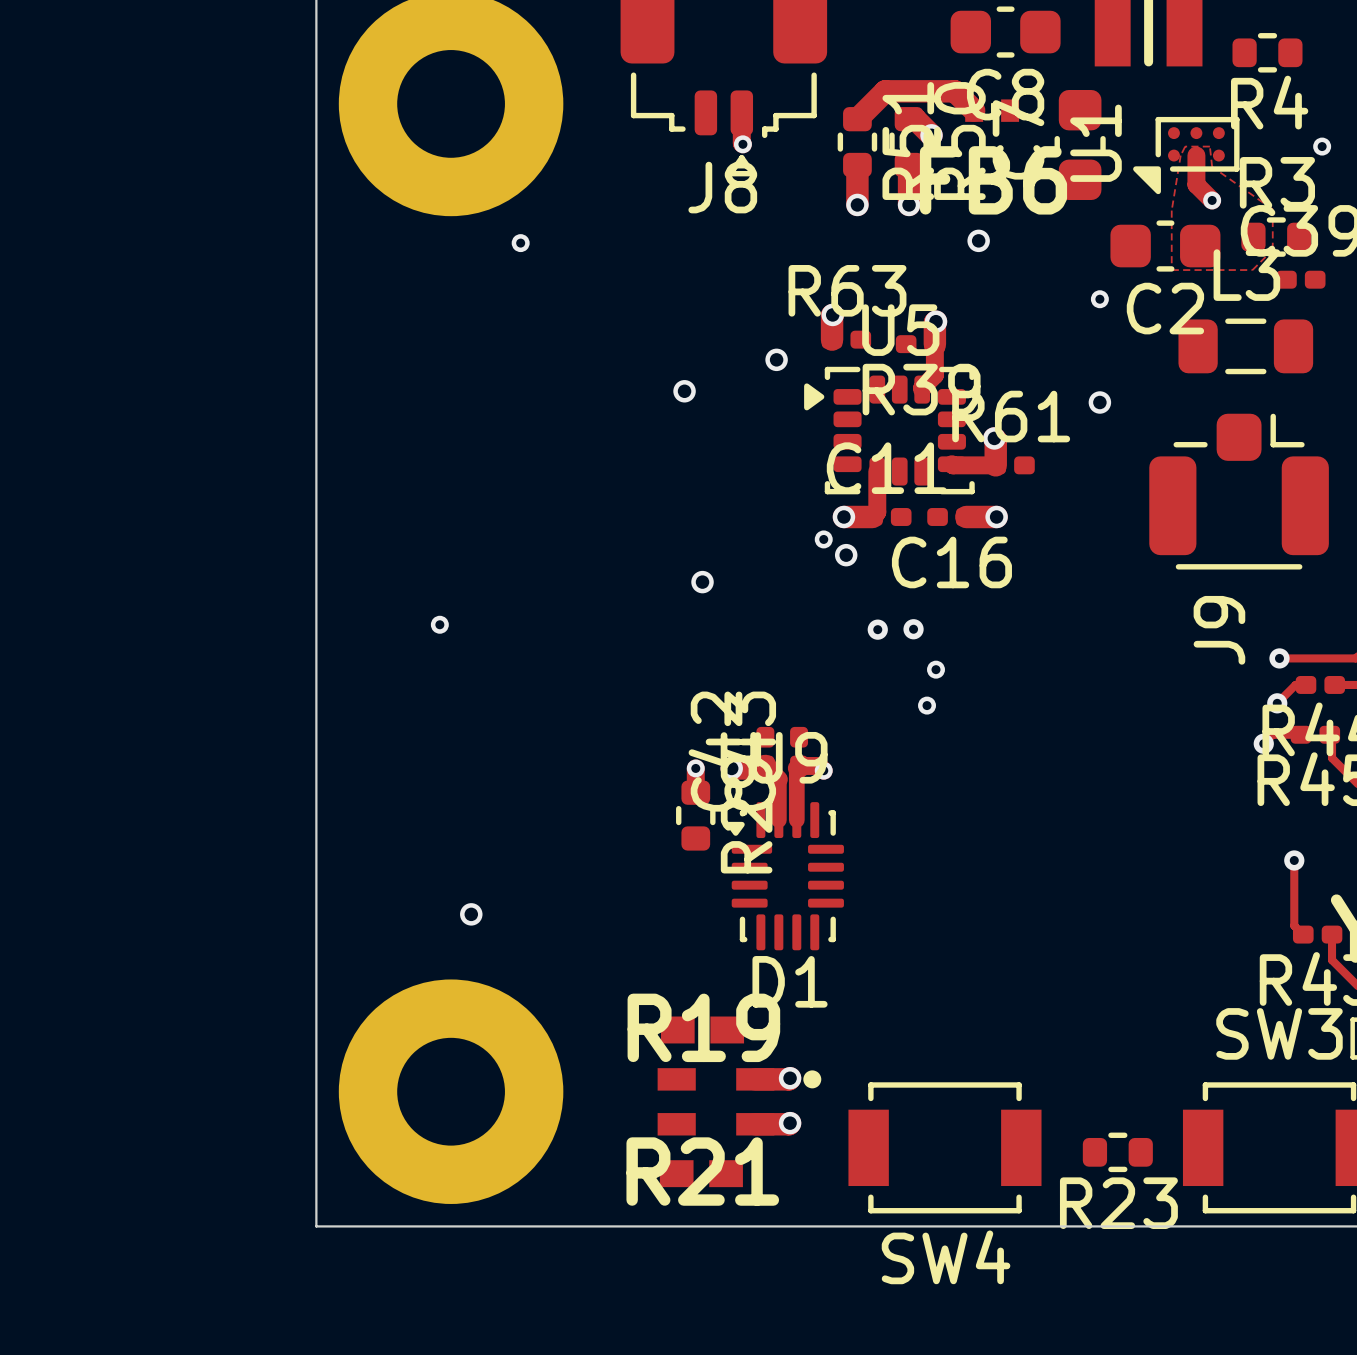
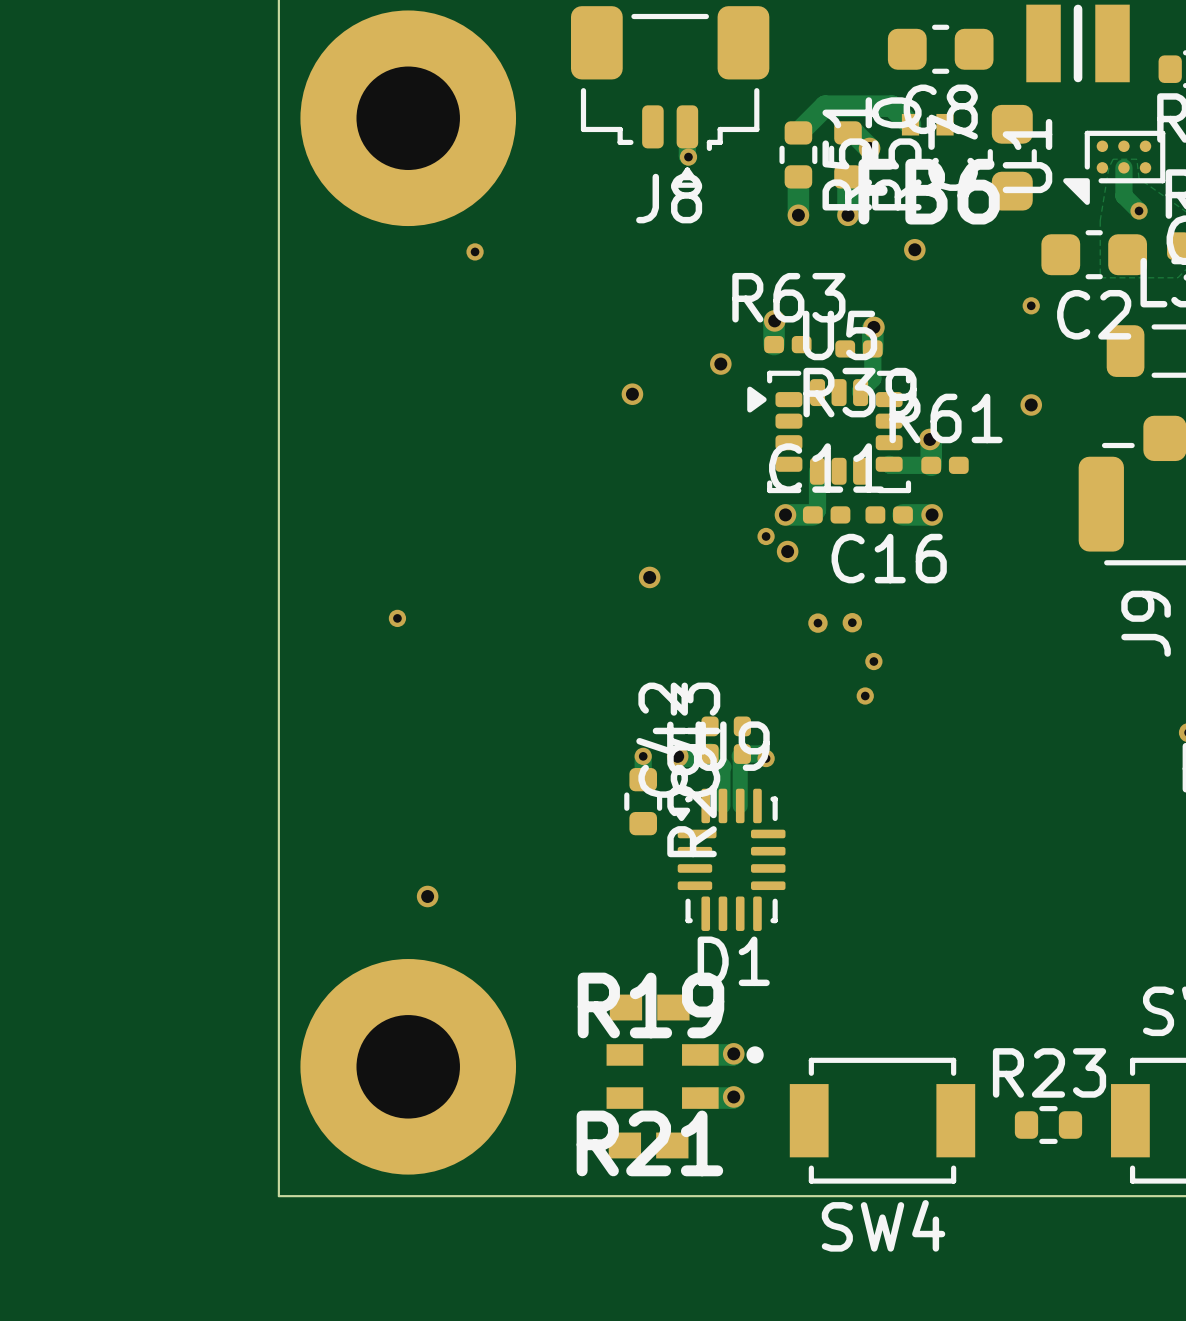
R23 name position: R23 (1118, 1203) -> R23 (1049, 1072)

